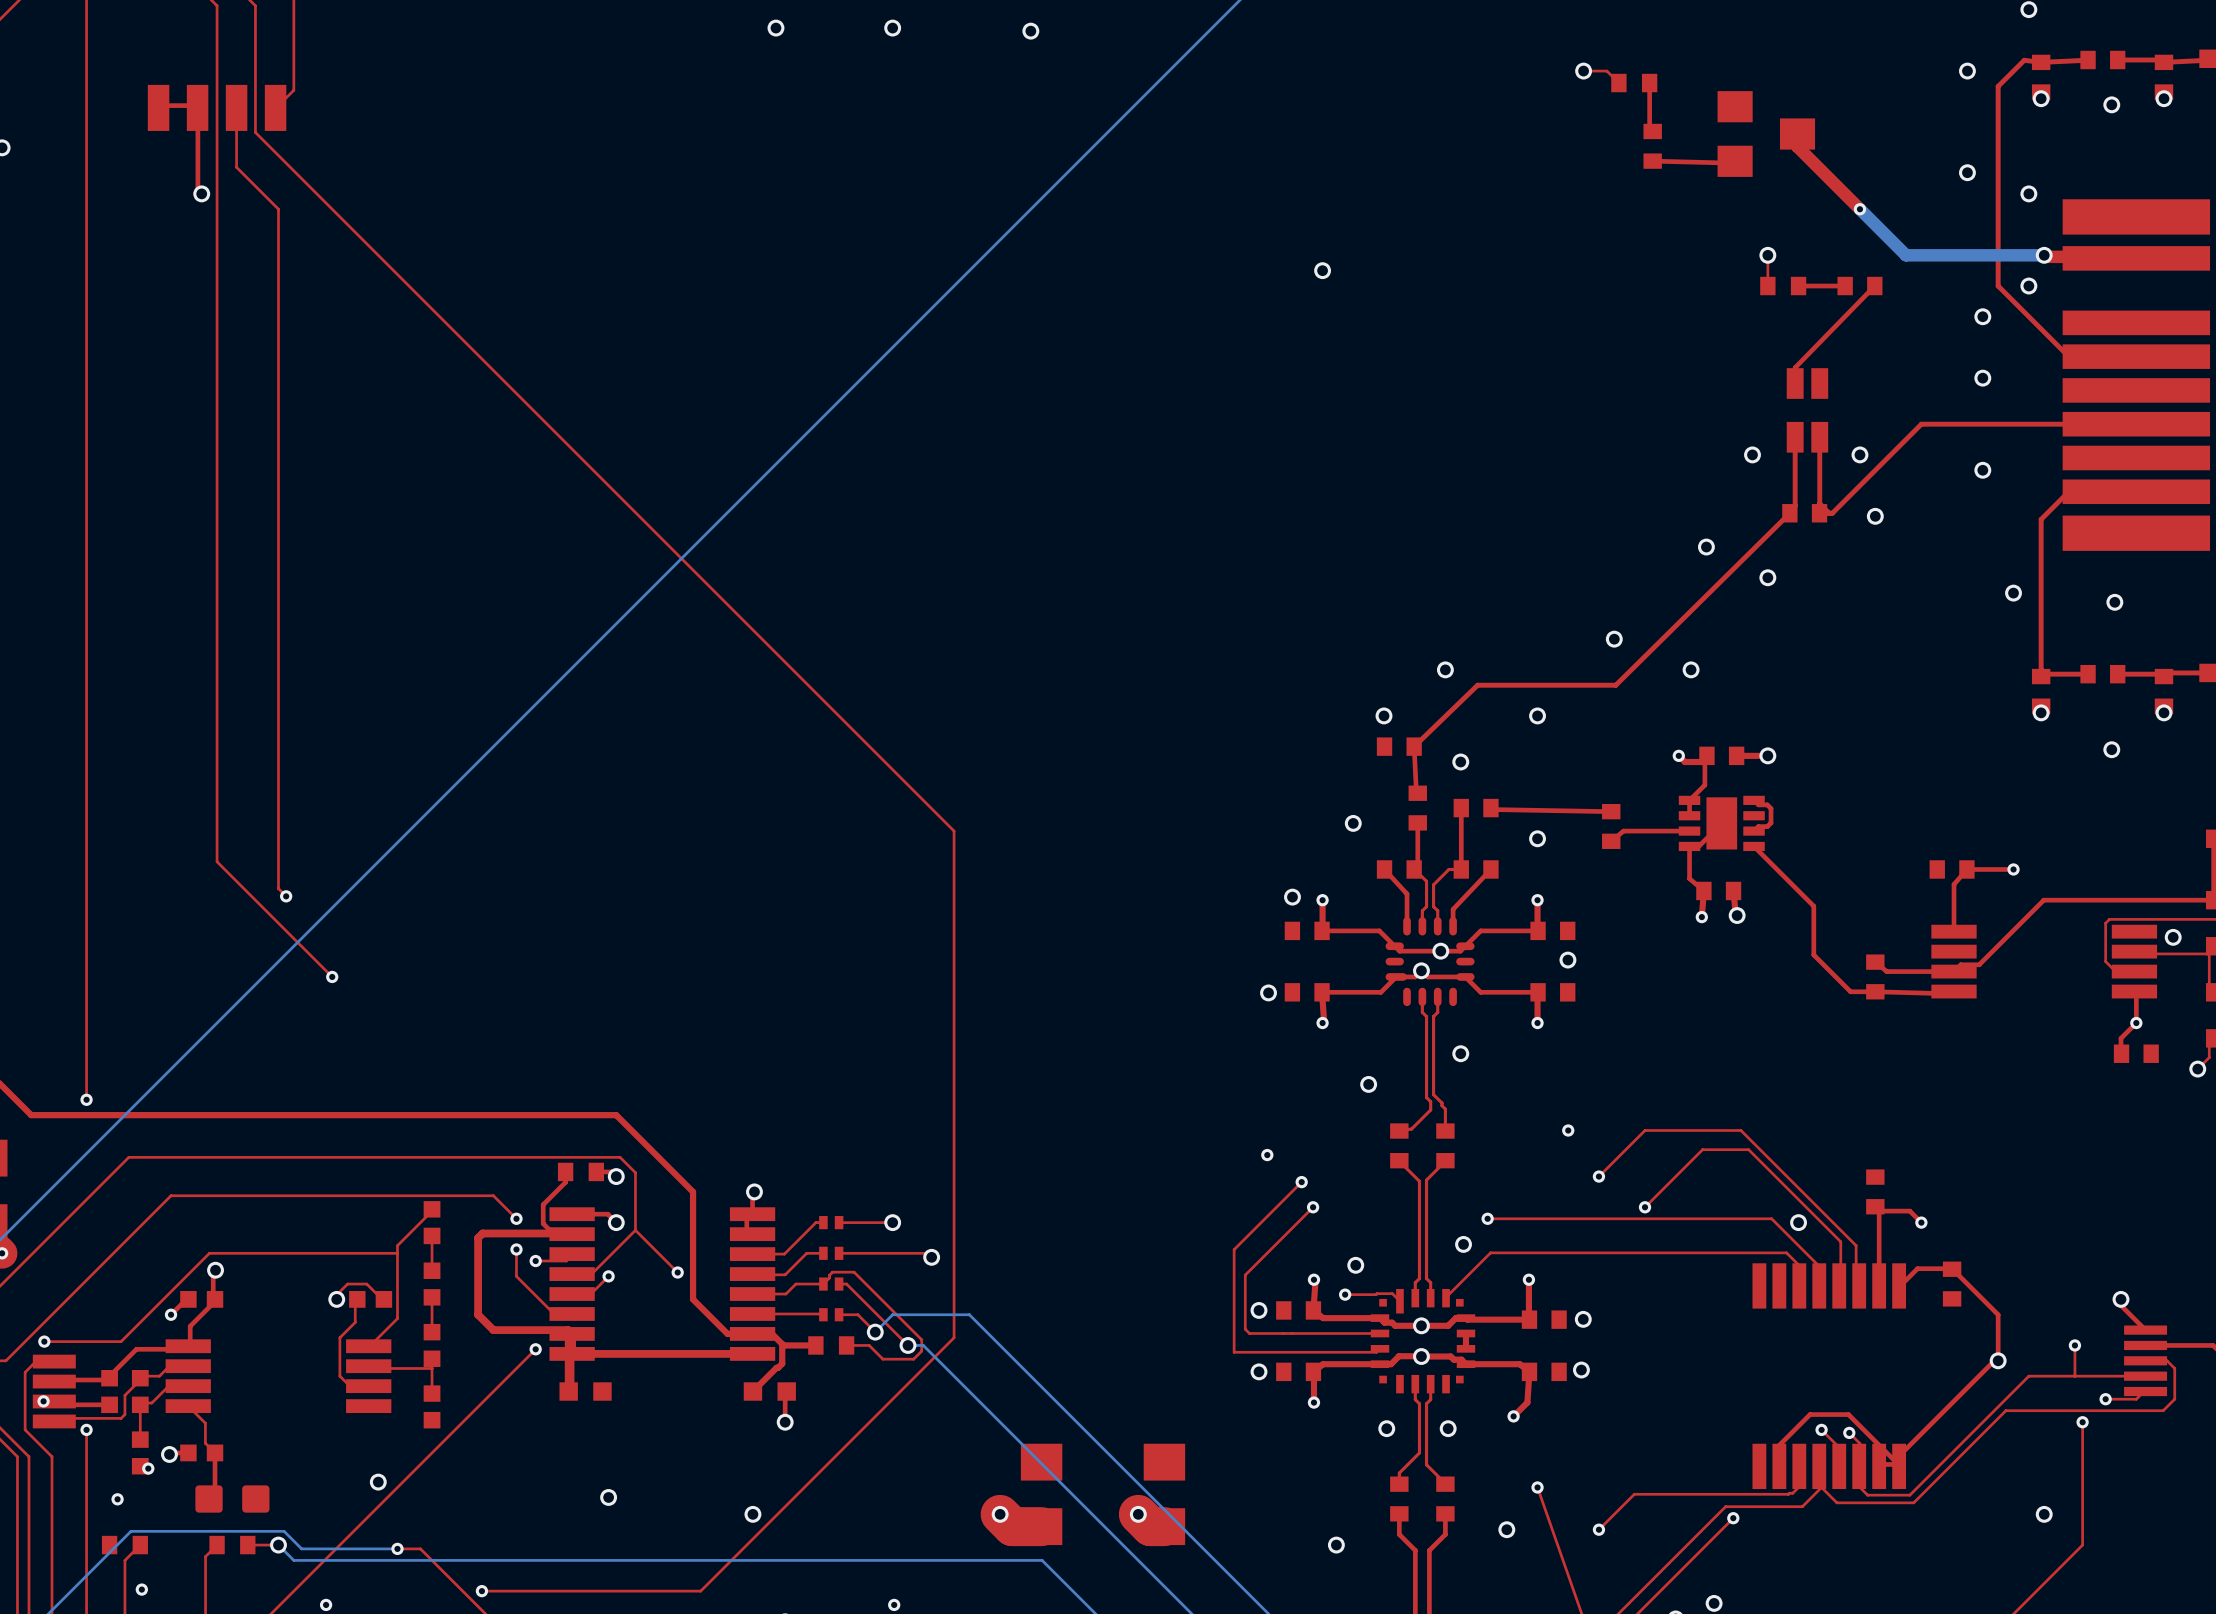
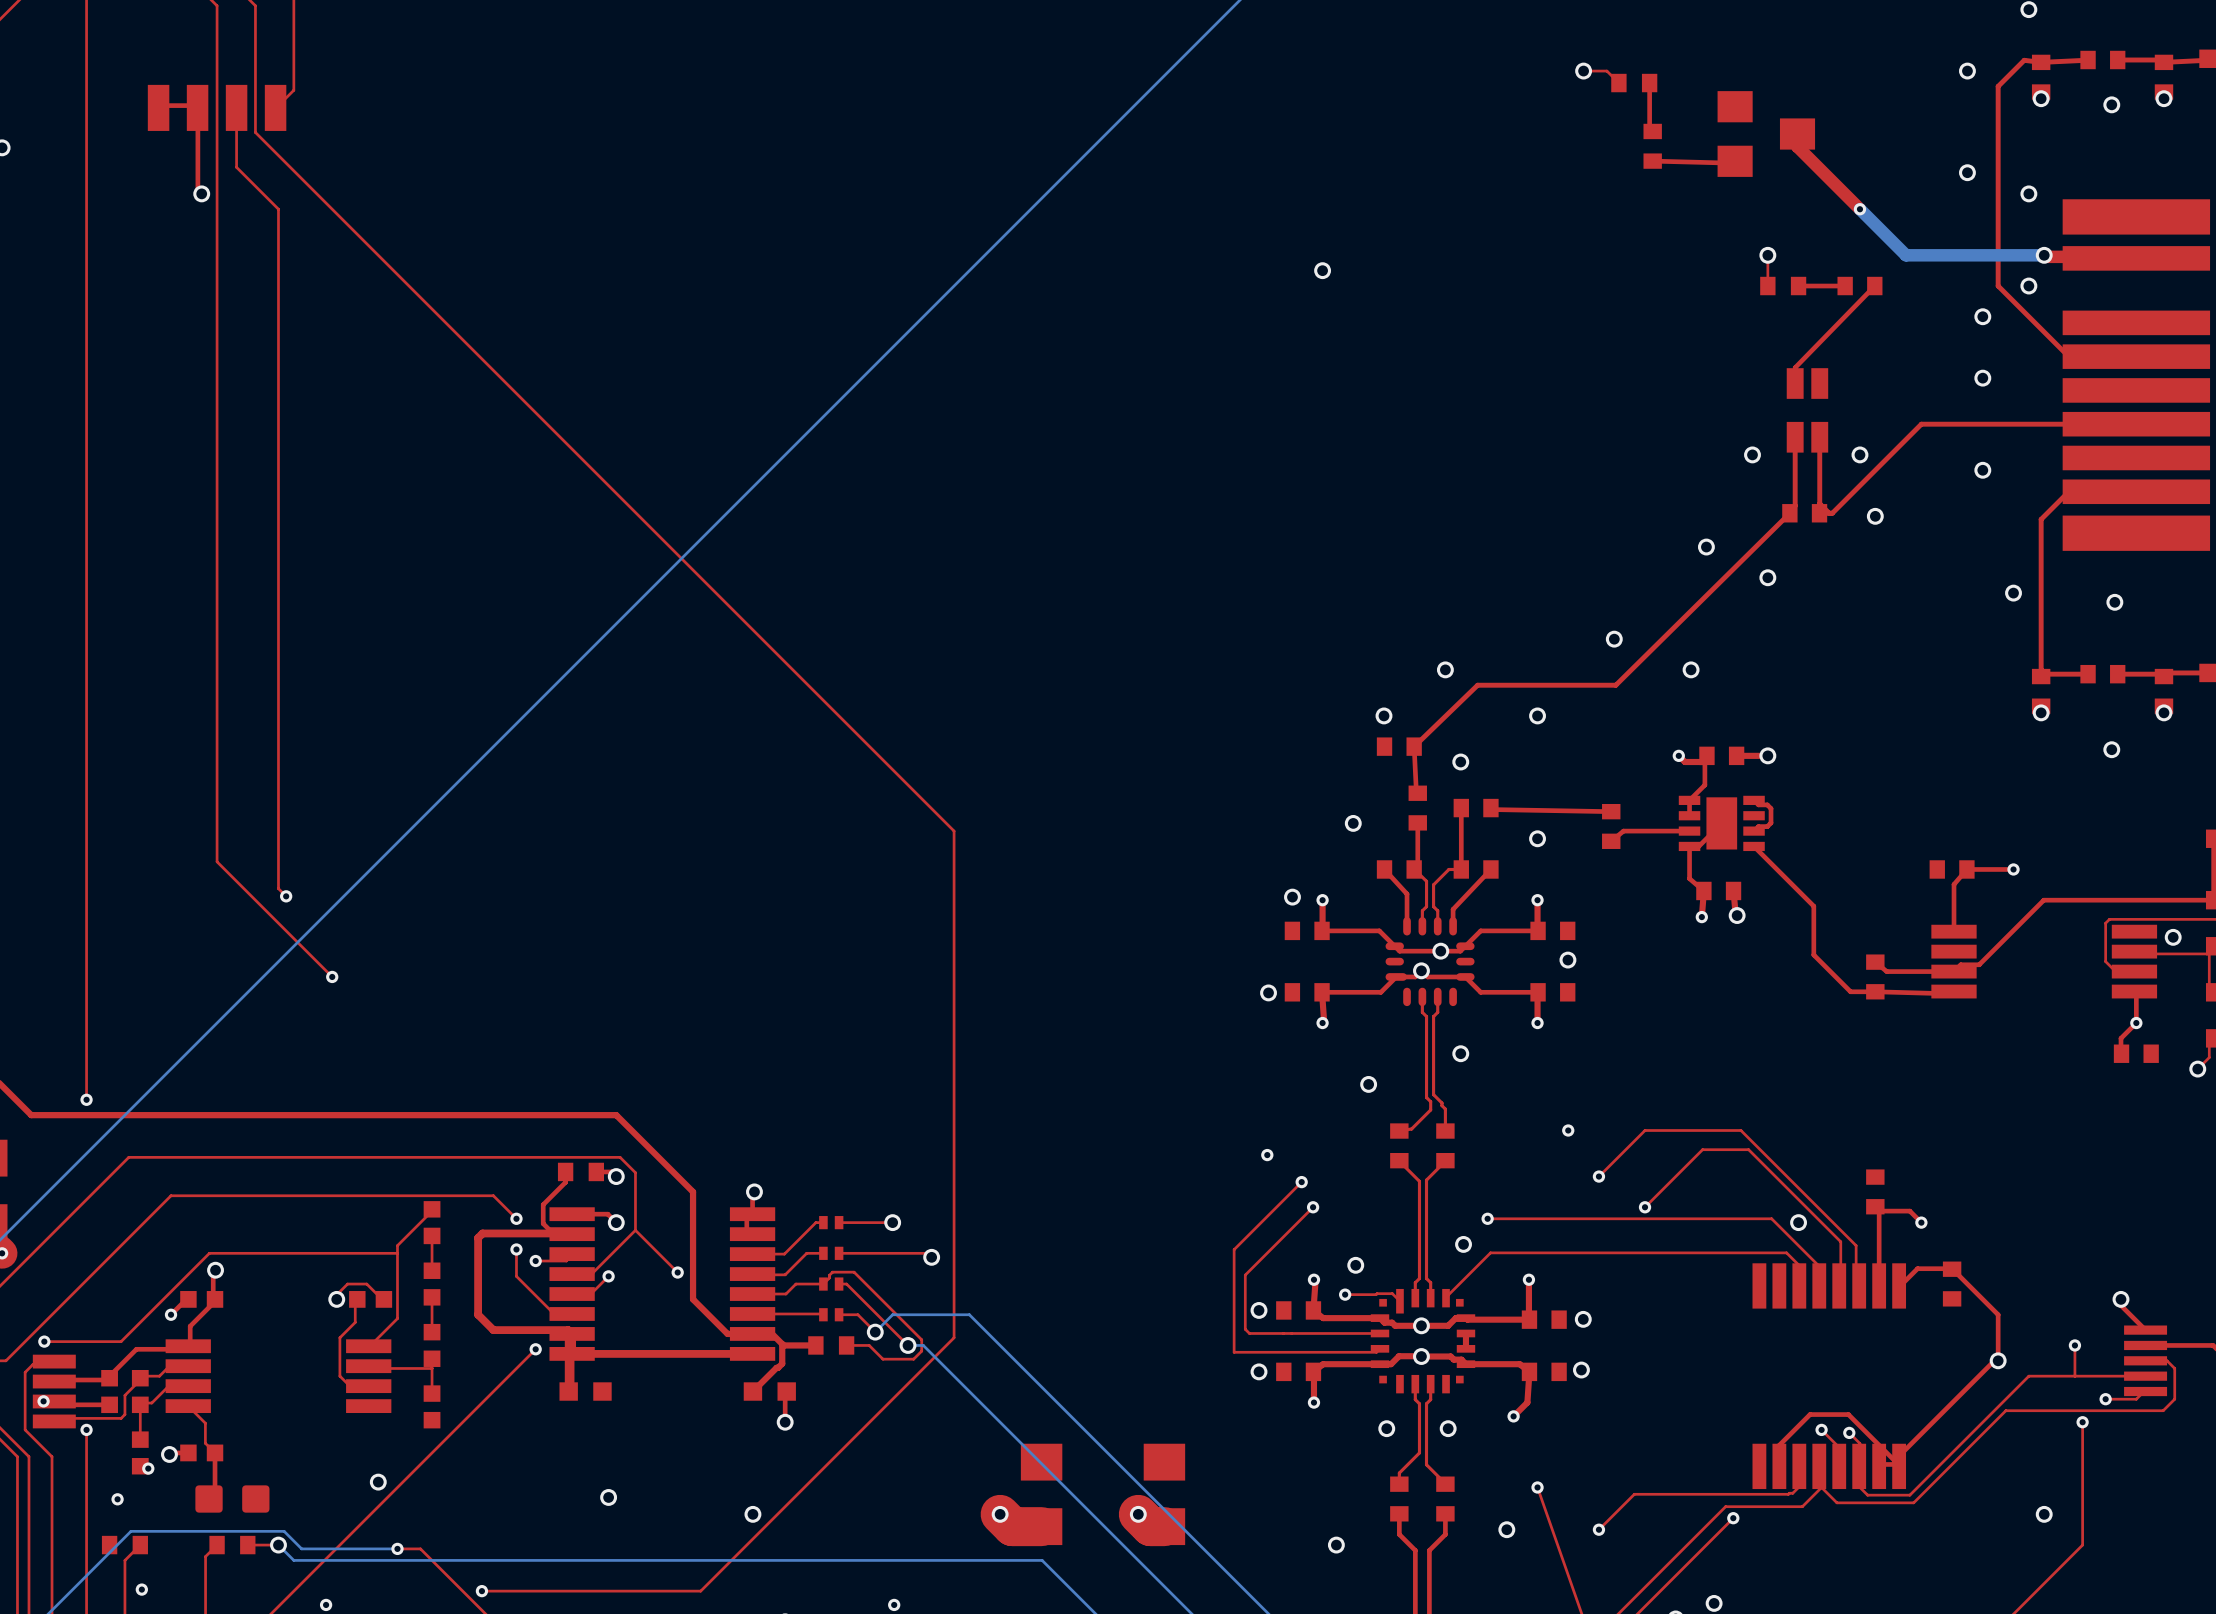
via: (775, 28) -> none
via: (892, 28) -> none
via: (1030, 31) -> none

